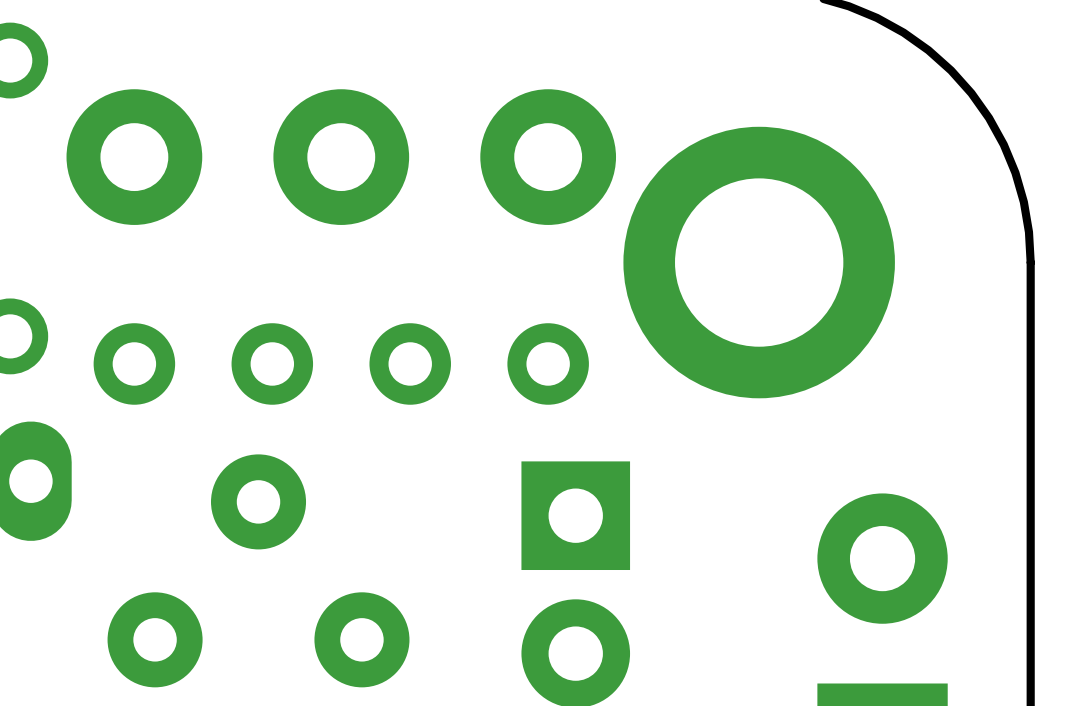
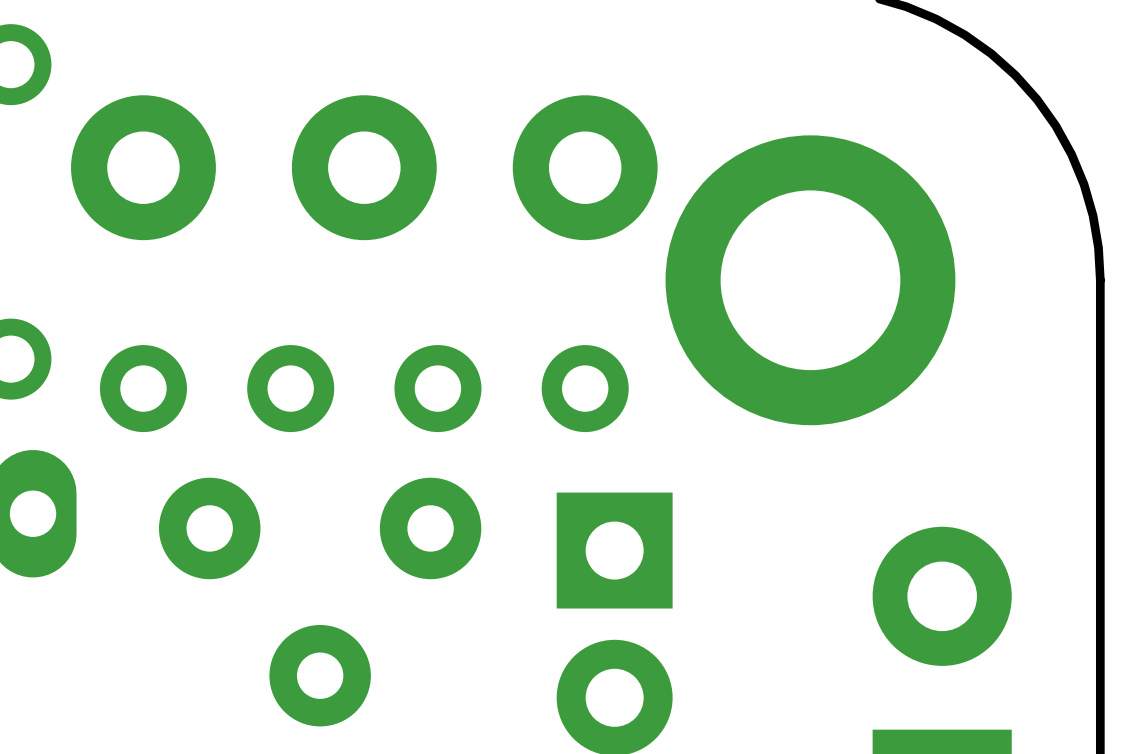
part rotation: 0° (258, 570) -> 180° (320, 602)

